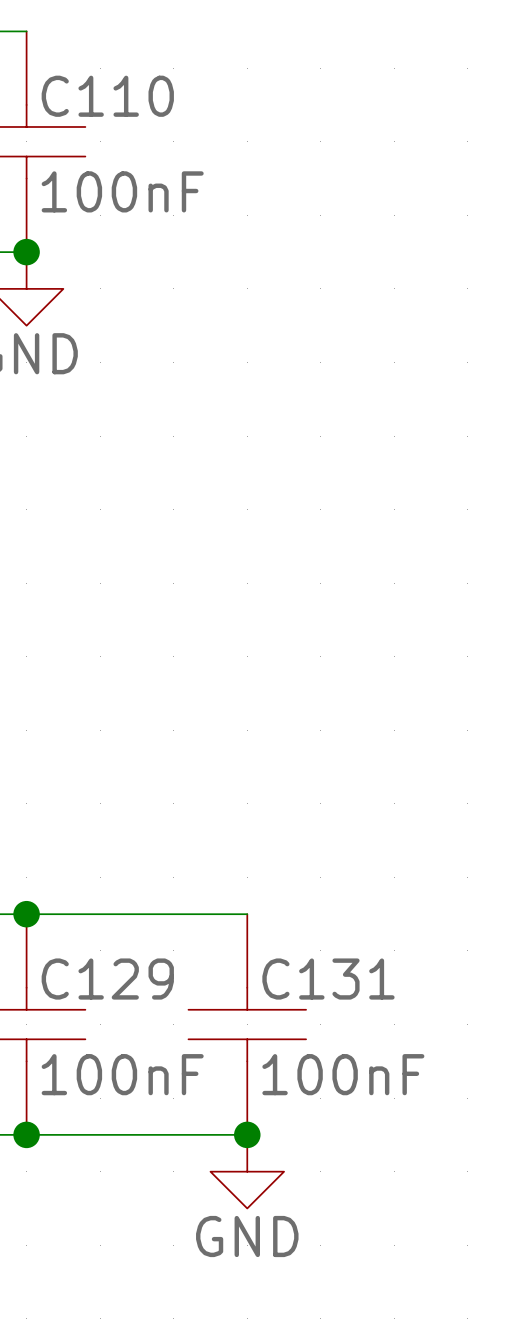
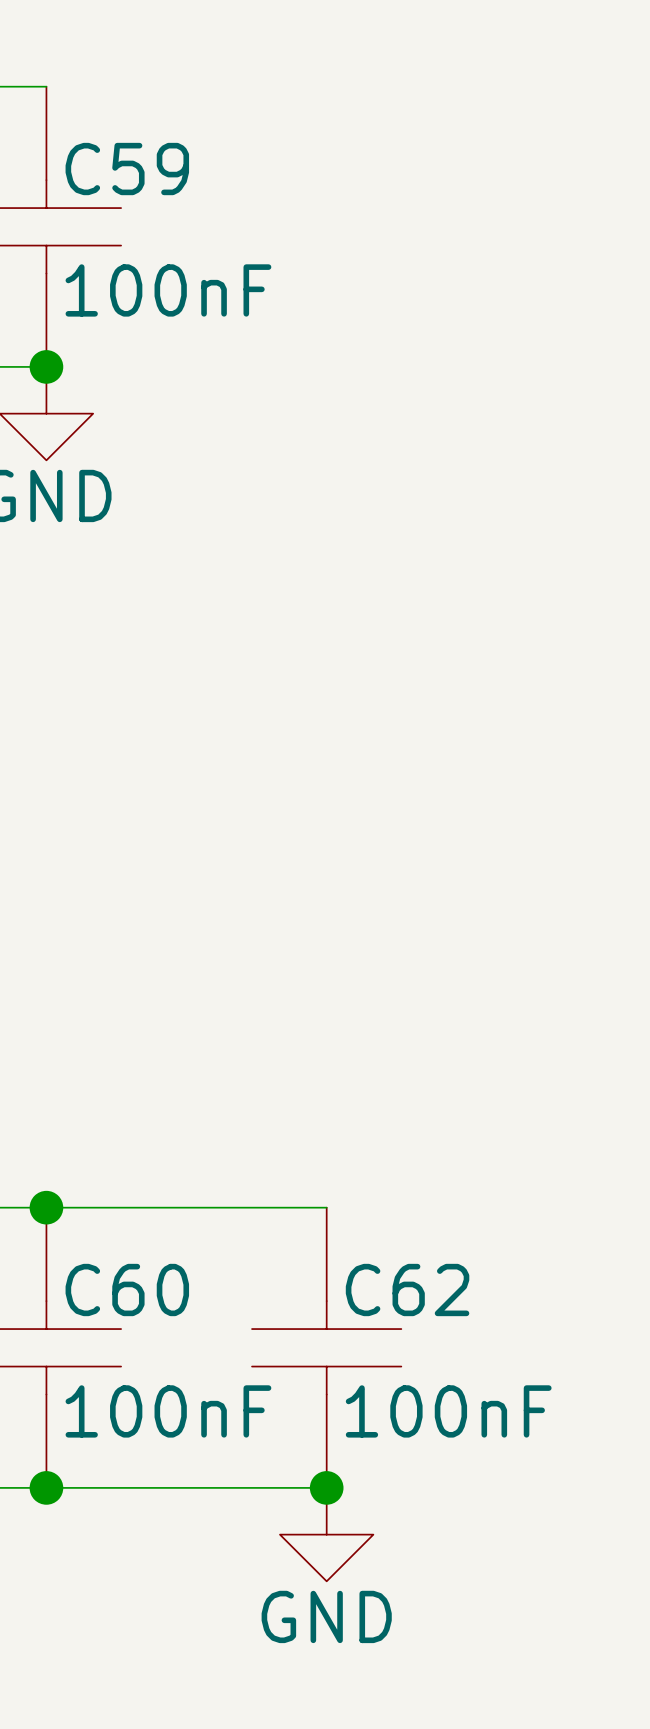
C110 name: C110 (107, 96) -> C59 (127, 169)
C129 name: C129 (107, 979) -> C60 (127, 1290)
C131 name: C131 (328, 979) -> C62 (407, 1290)

